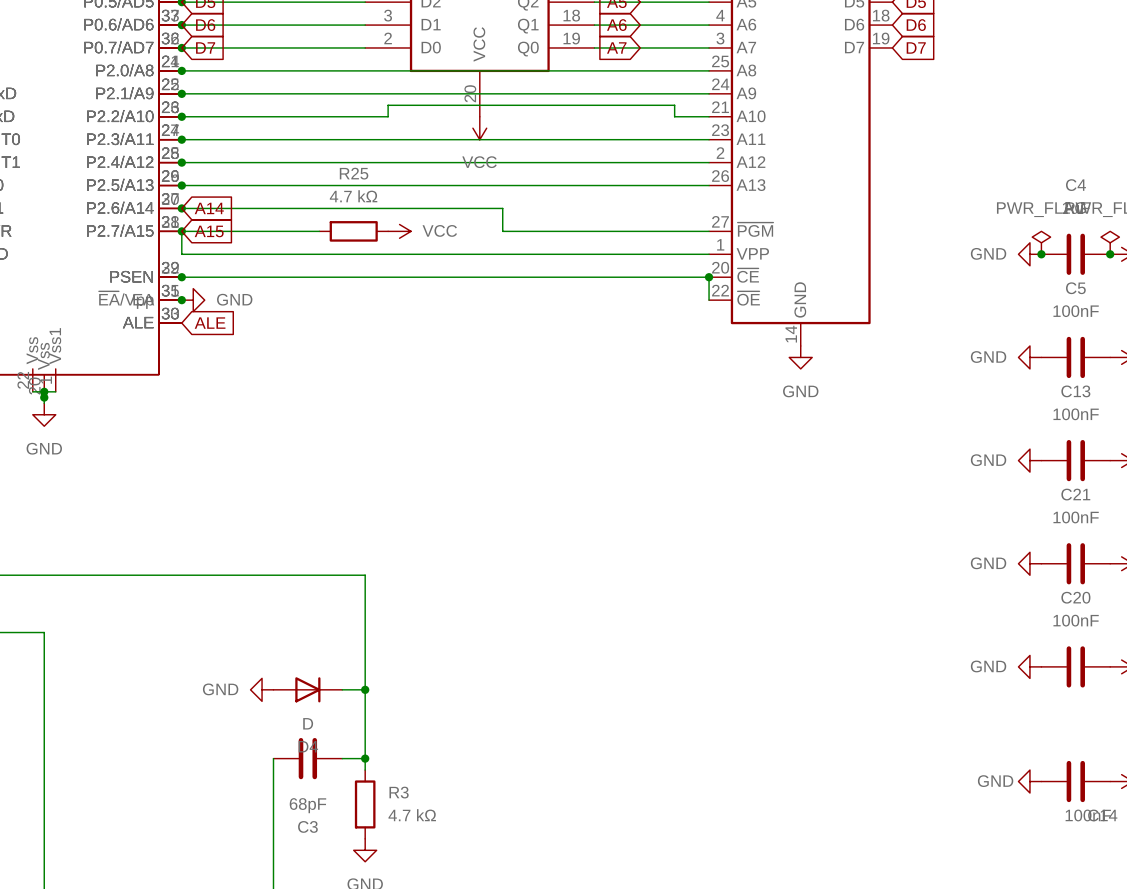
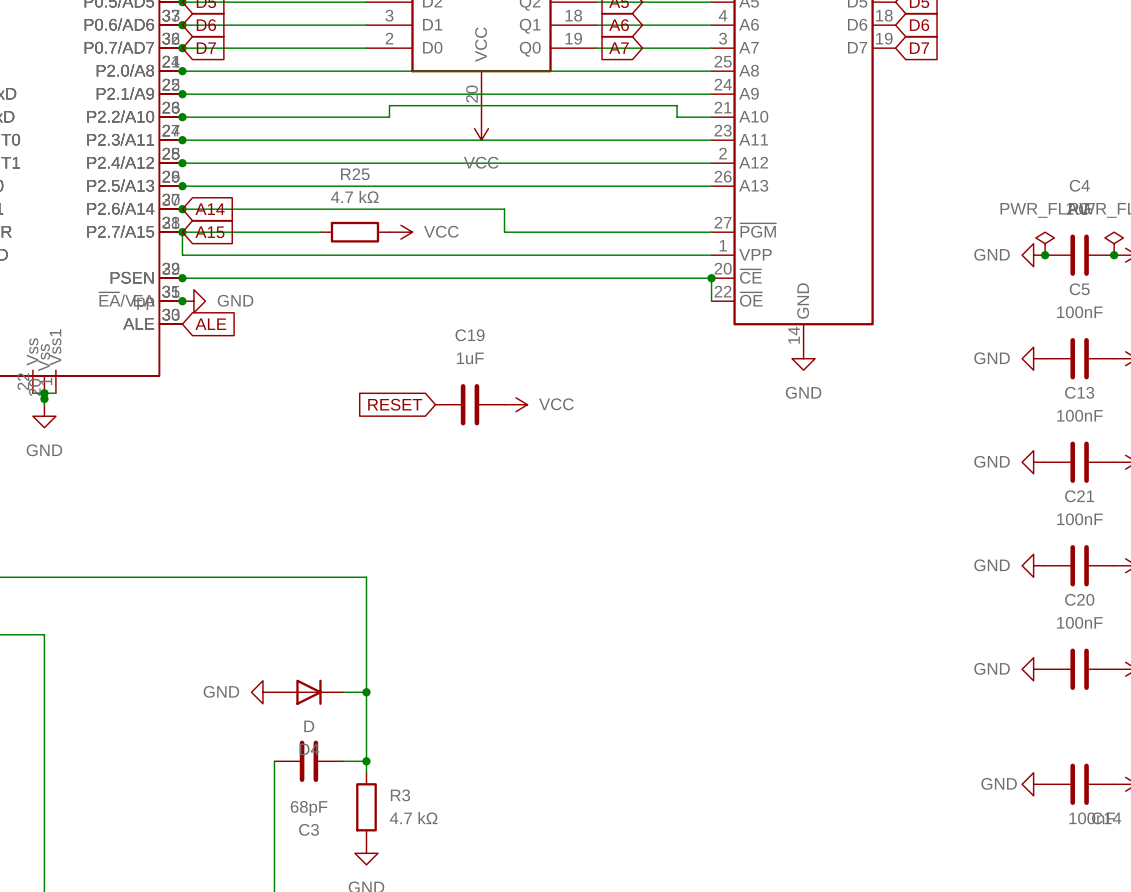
global label: none -> RESET (395, 404)
C19: none -> 1uF (470, 404)
power symbol: none -> VCC (516, 404)

